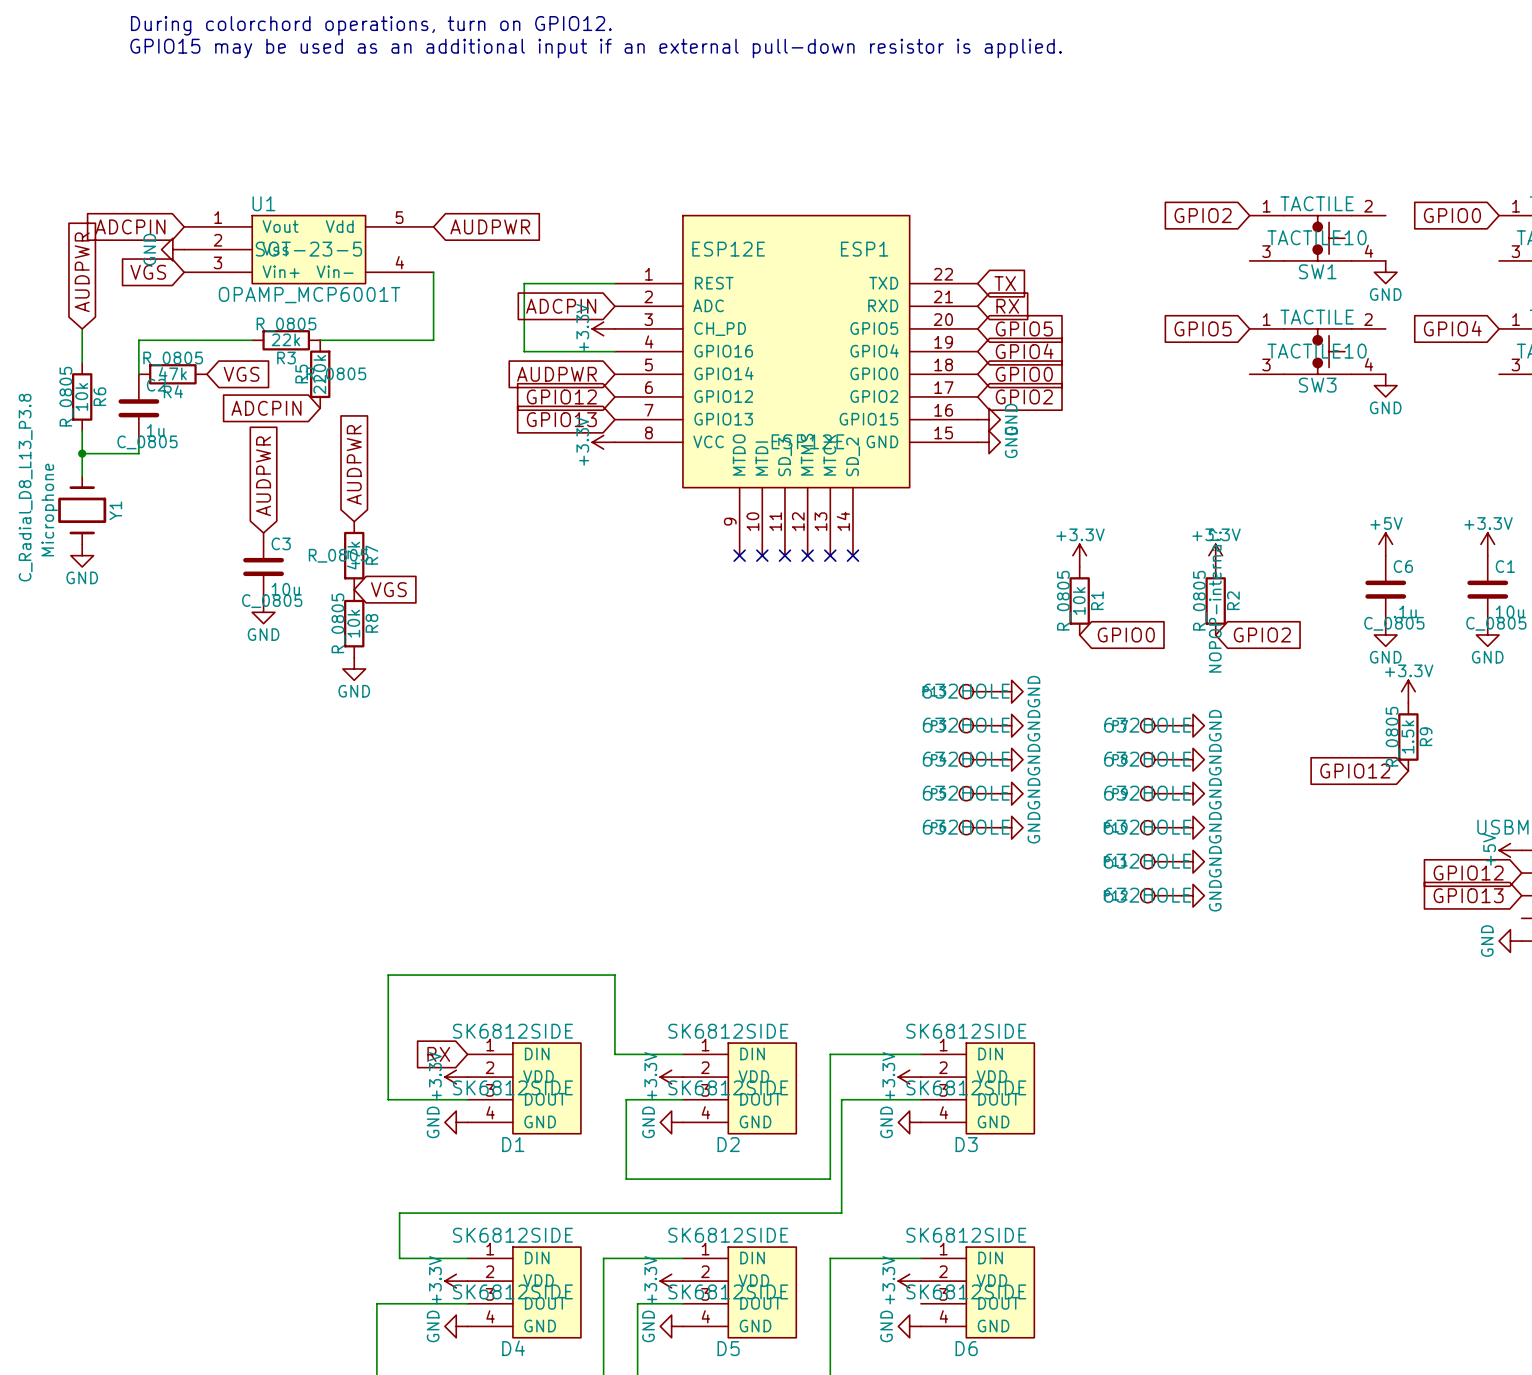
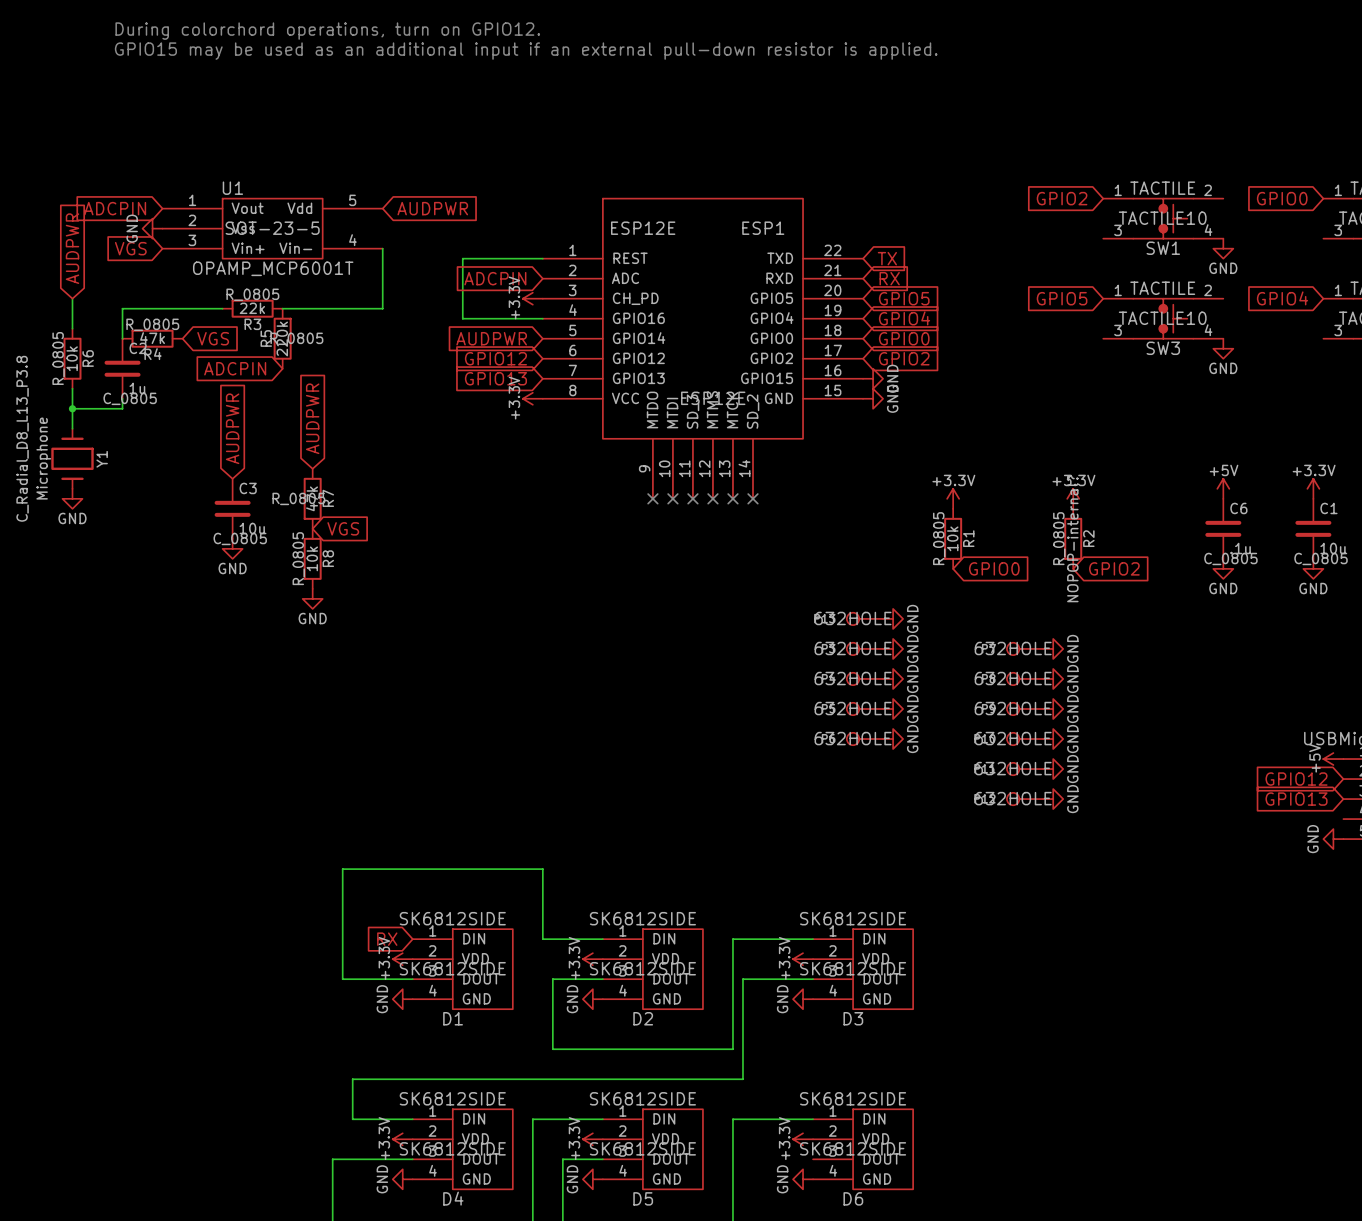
power symbol: +3.3V (1408, 691) -> none
R9: 1.5k (1408, 737) -> none
global label: GPIO12 (1355, 771) -> none

